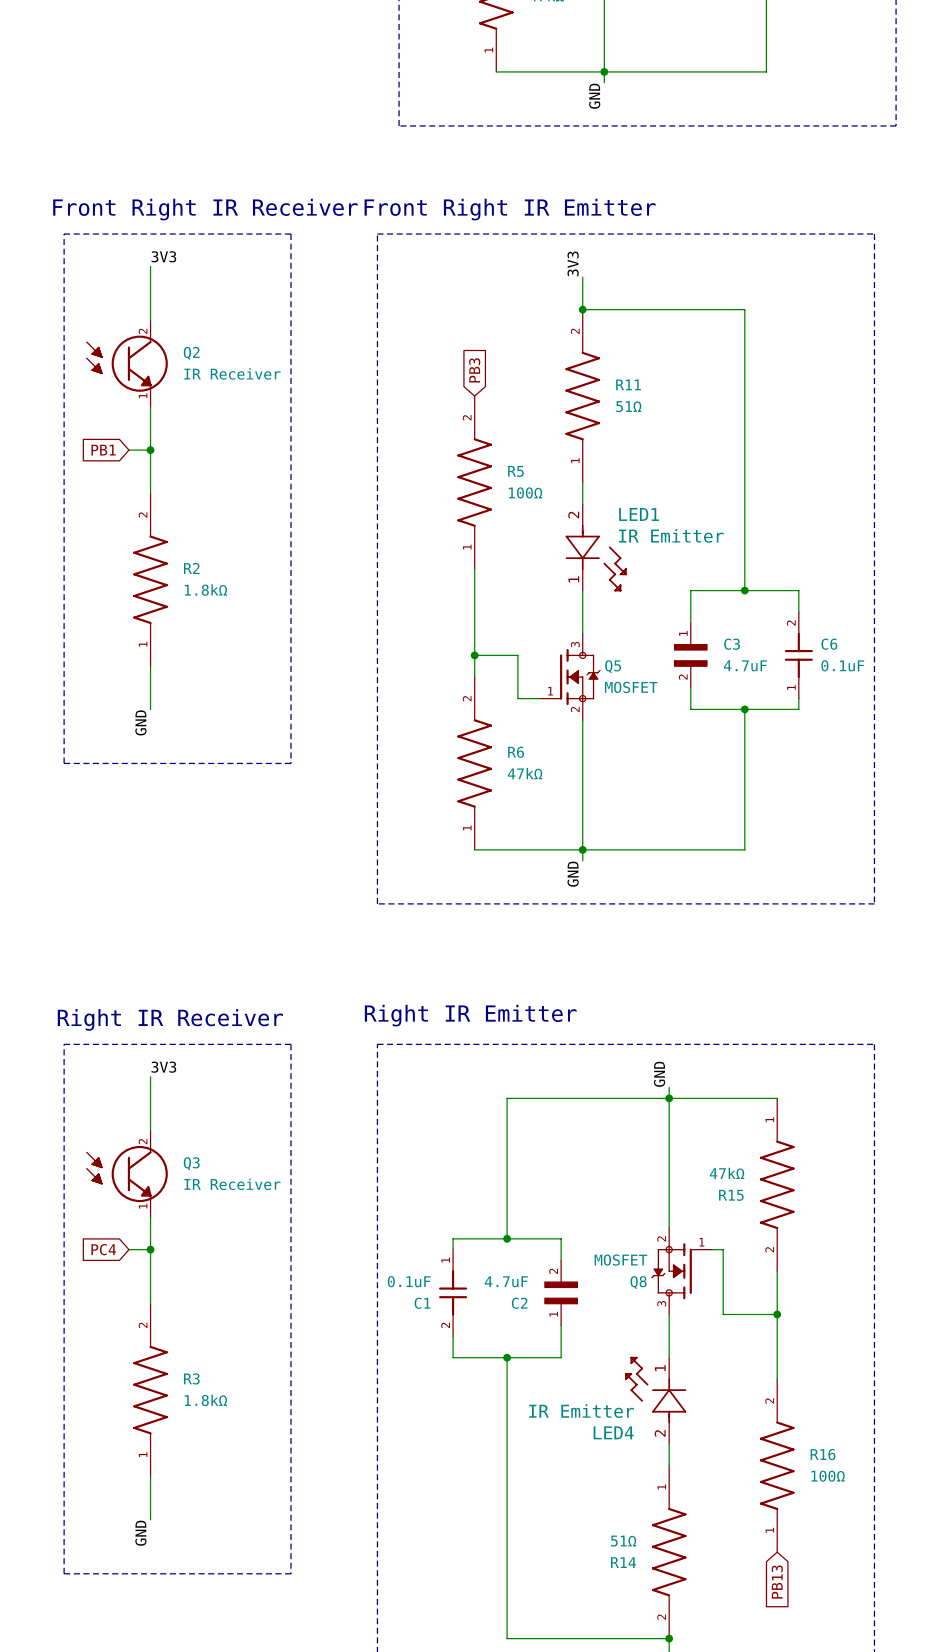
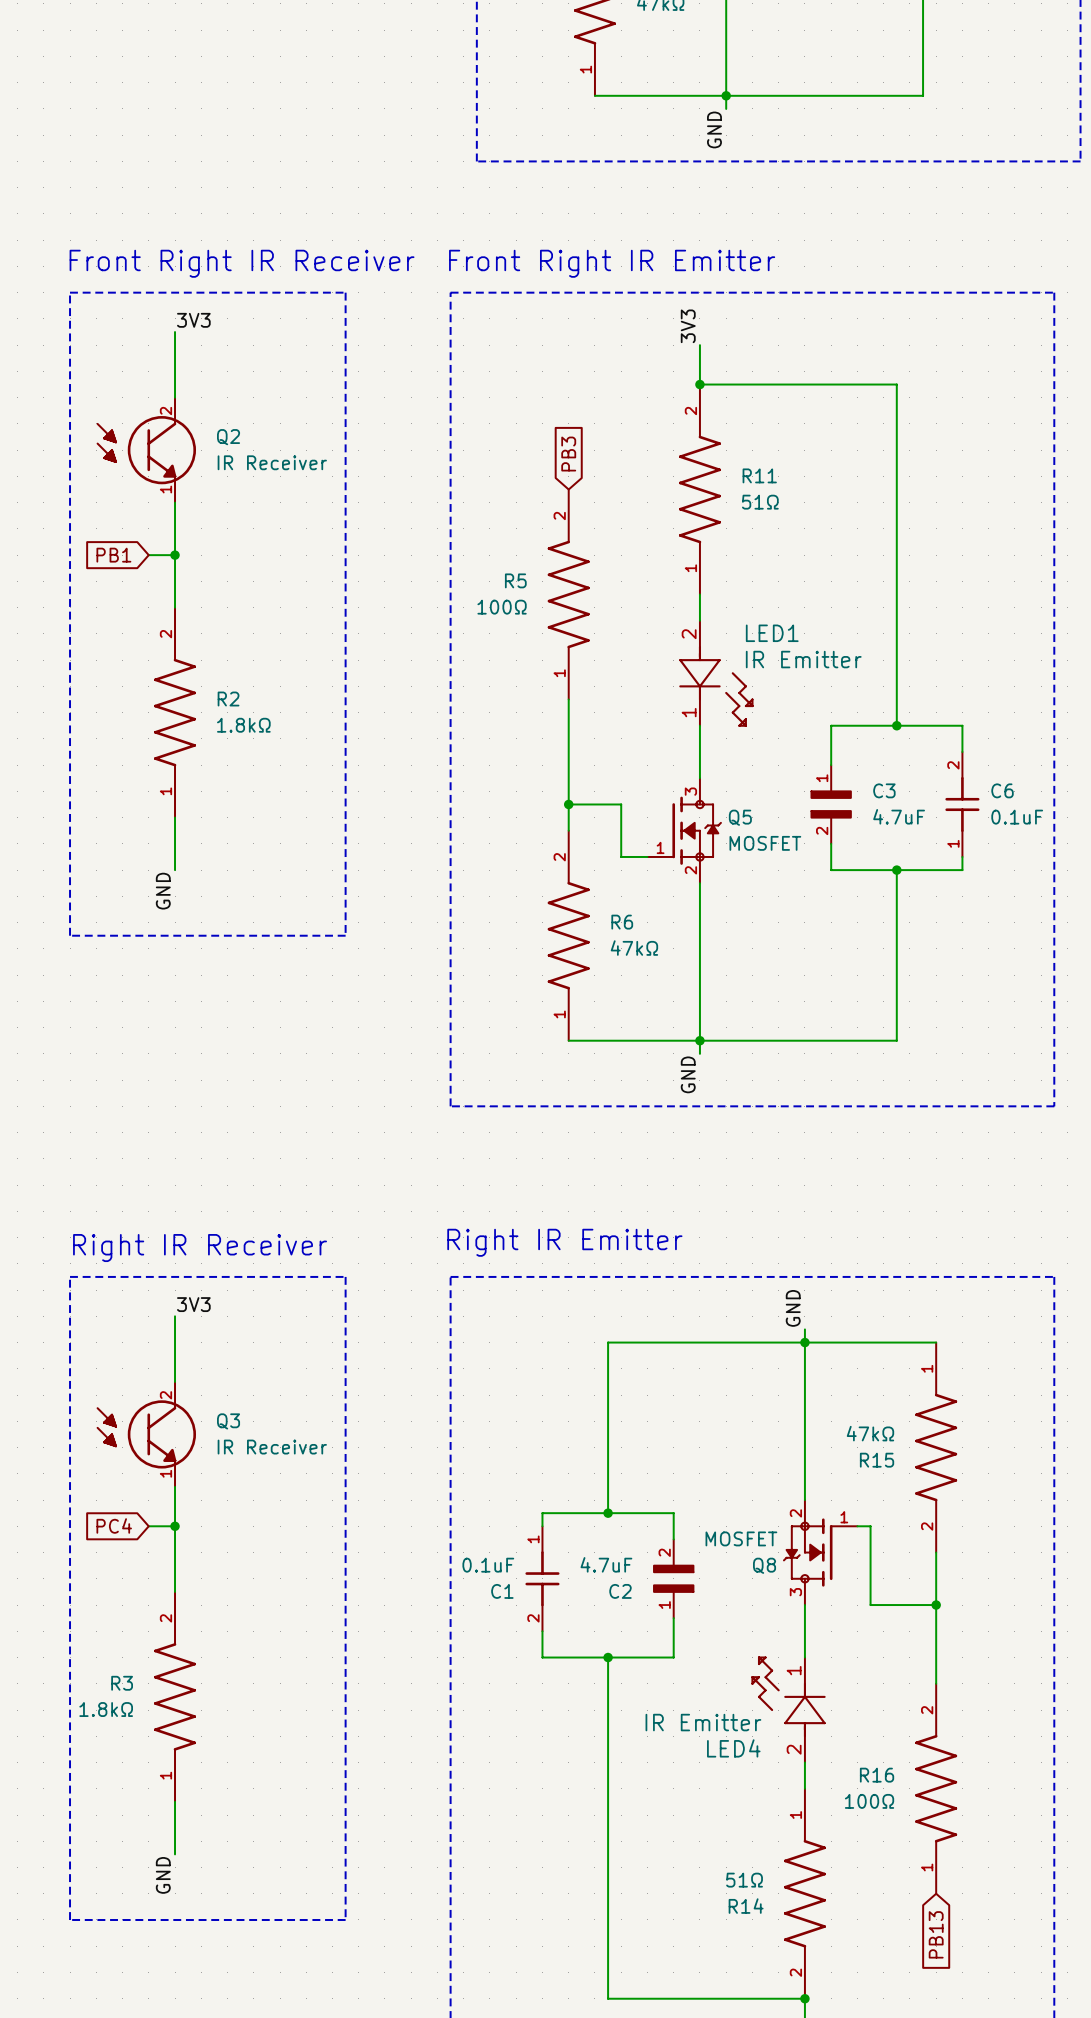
R5 flip: as is (474, 482) -> left-right (568, 594)
R3 flip: as is (150, 1390) -> left-right (175, 1696)
R16 flip: as is (777, 1465) -> left-right (936, 1788)

